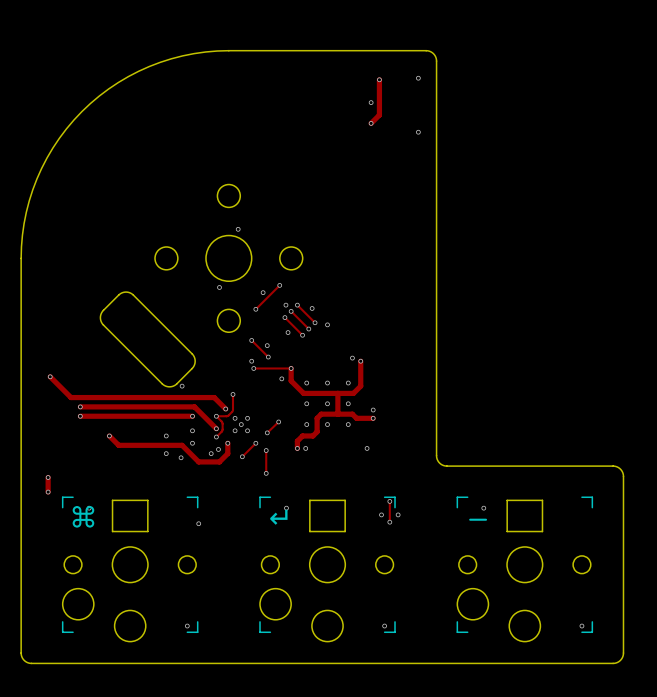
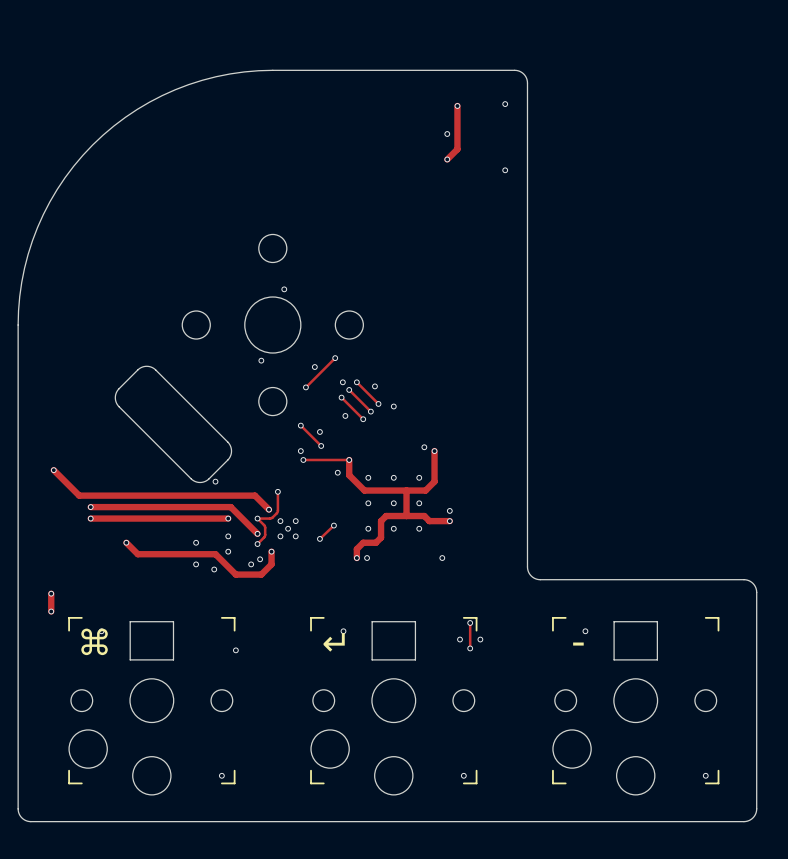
track: (255, 443) (242, 456) -> none
via: (255, 443) -> none
track: (266, 450) (266, 473) -> none
via: (266, 450) -> none
via: (242, 456) -> none
via: (266, 473) -> none

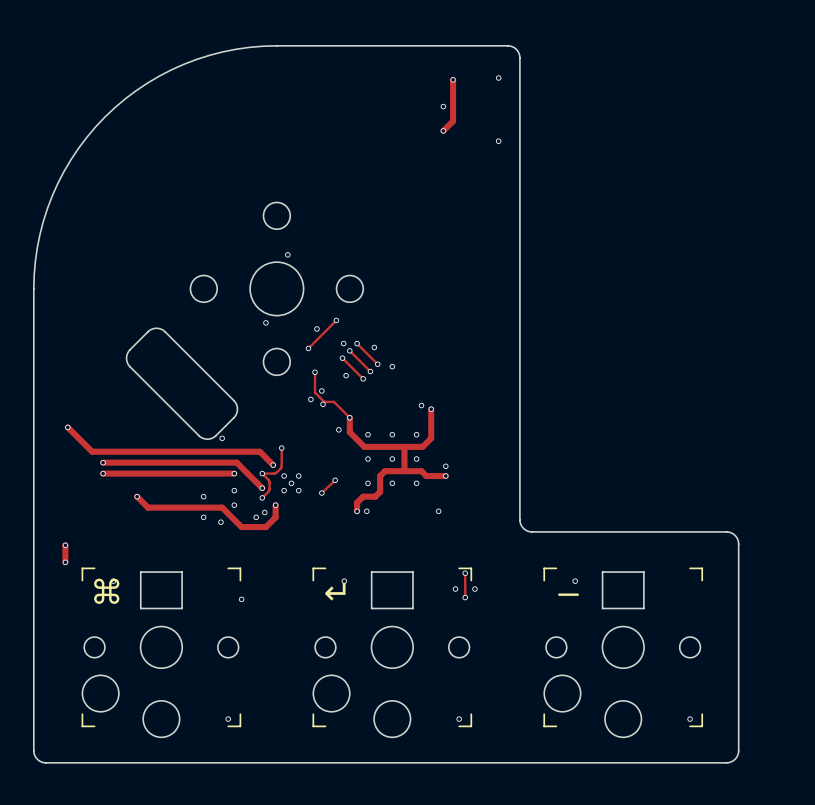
via: none -> (315, 372)
track: (300, 425) (321, 445) -> none
via: (300, 425) -> none
via: none -> (310, 399)
via: (300, 451) -> none
track: (303, 459) (349, 459) -> (315, 372) (315, 392) (324, 401) (333, 401) (349, 417)
via: (303, 459) -> none

